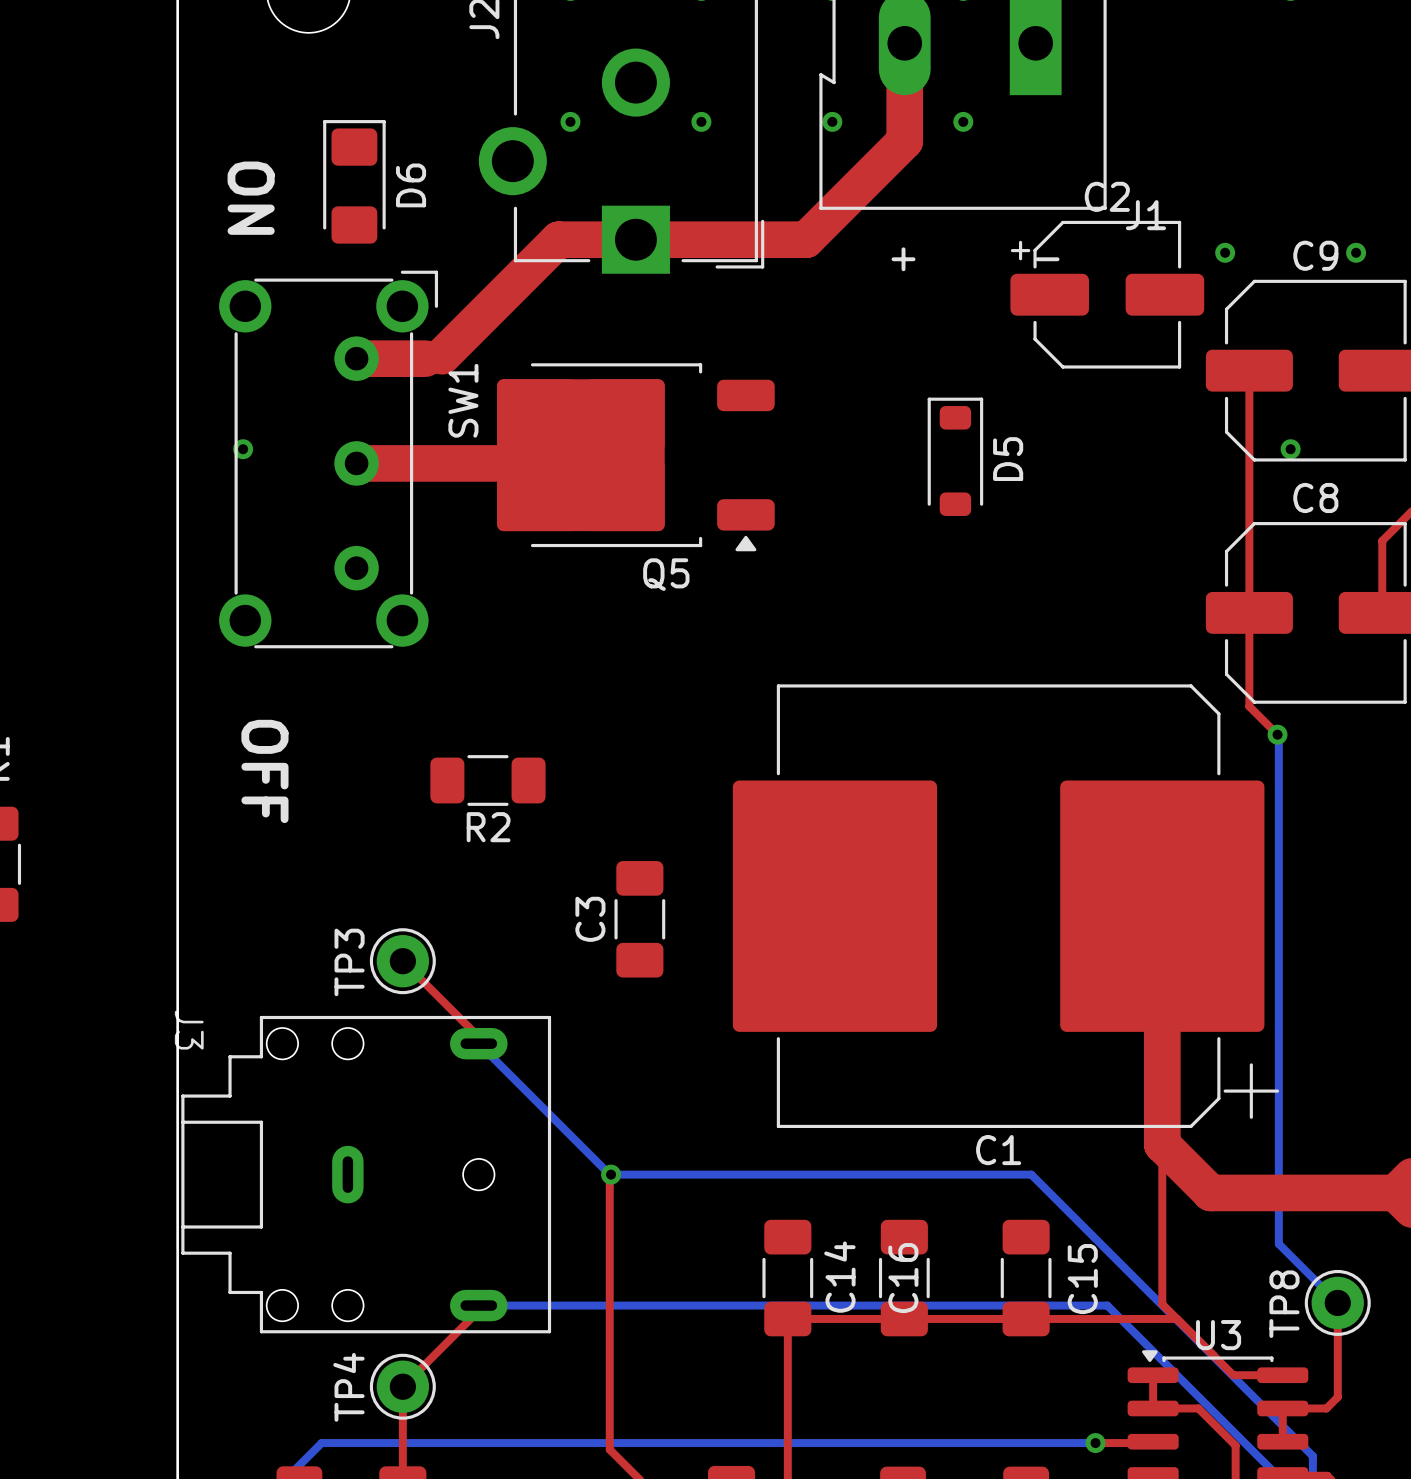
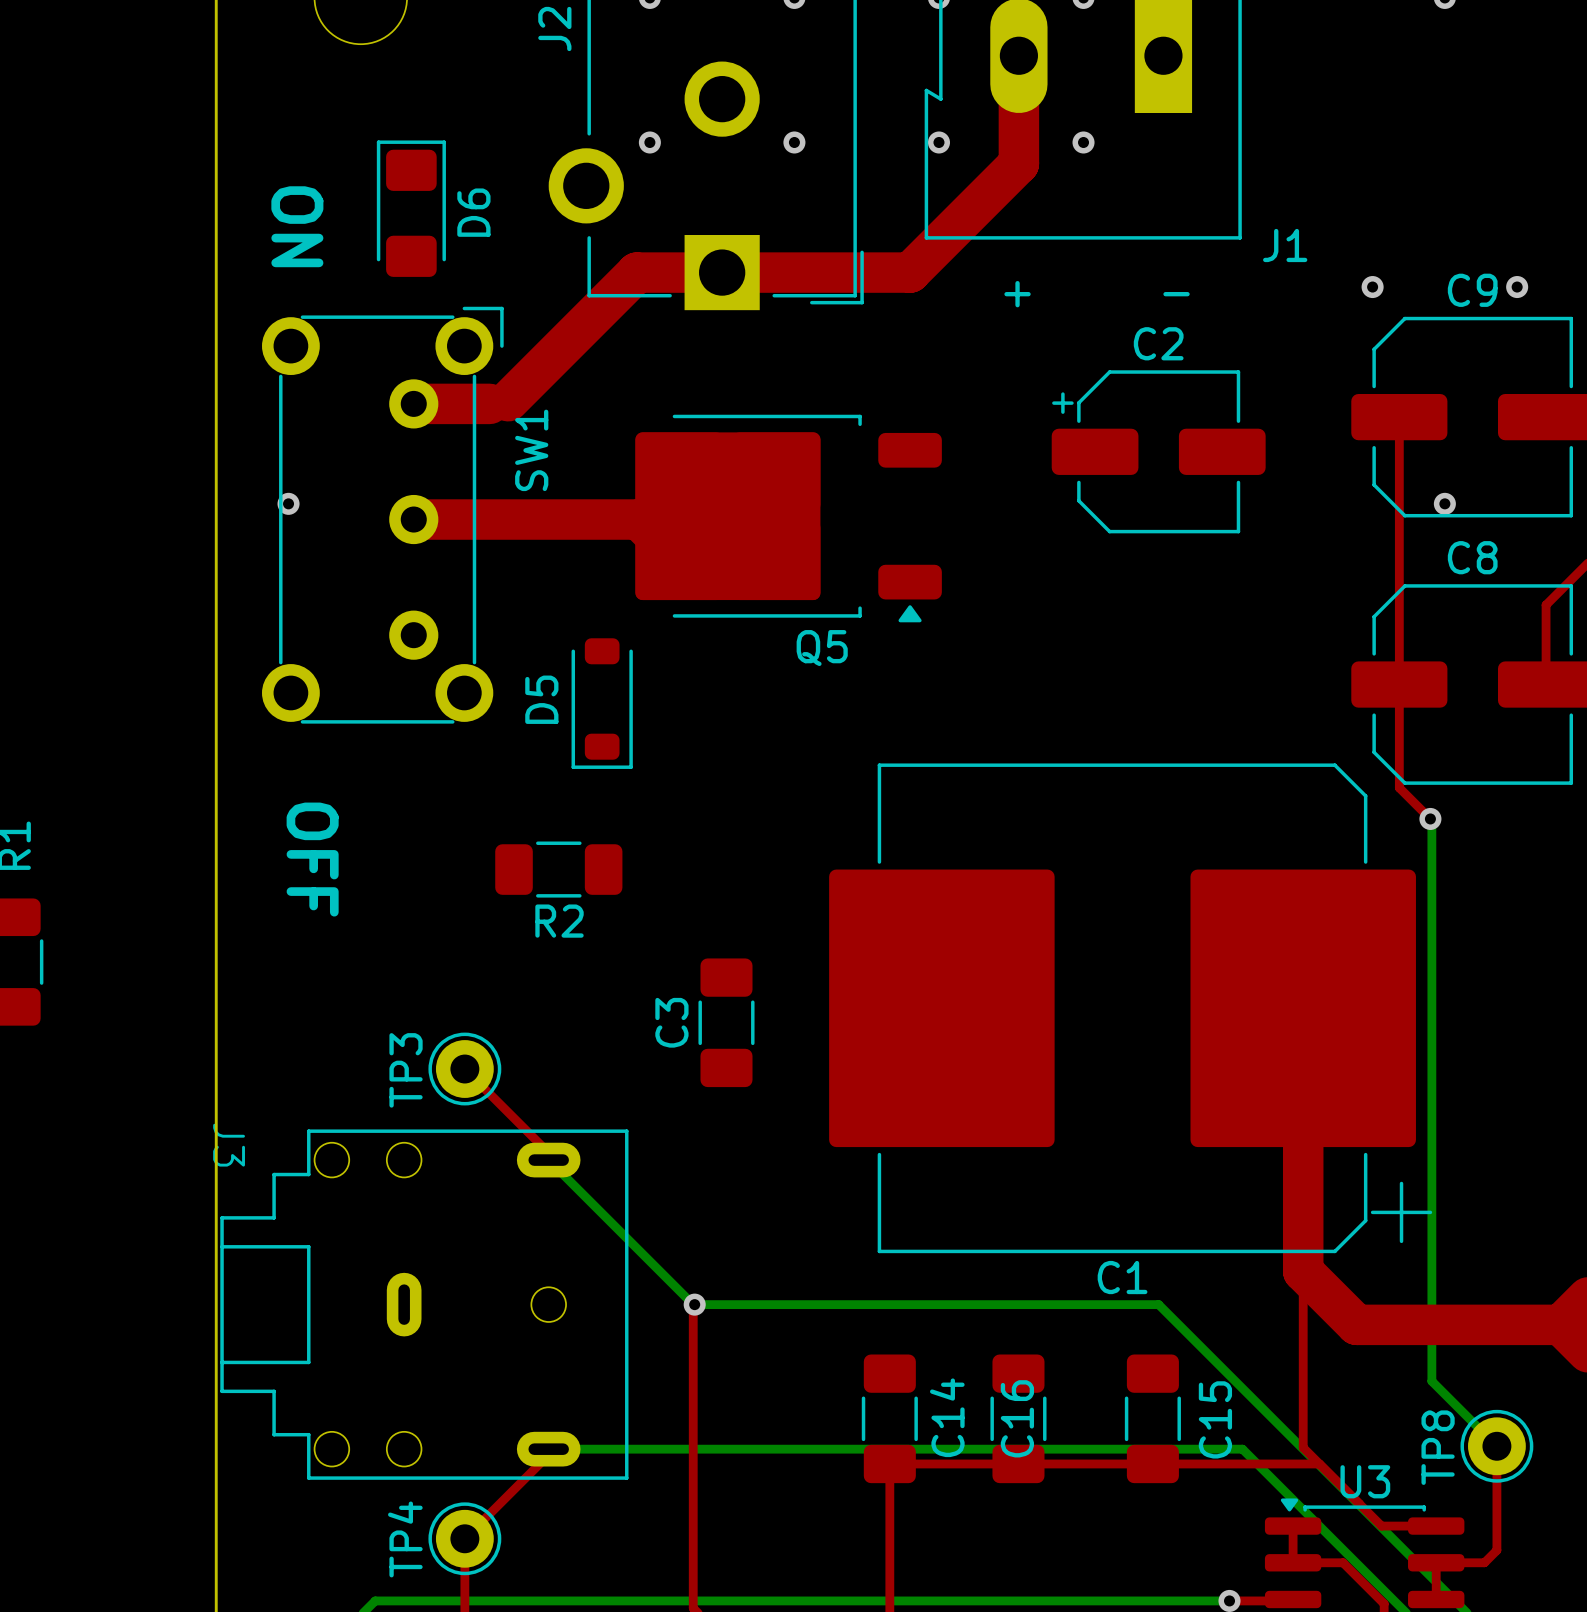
C2 position: (1107, 294) -> (1158, 451)
D5 rotation: 0° (955, 456) -> 180° (602, 703)
D5 position: (955, 456) -> (602, 703)
Q5 position: (635, 457) -> (788, 518)

